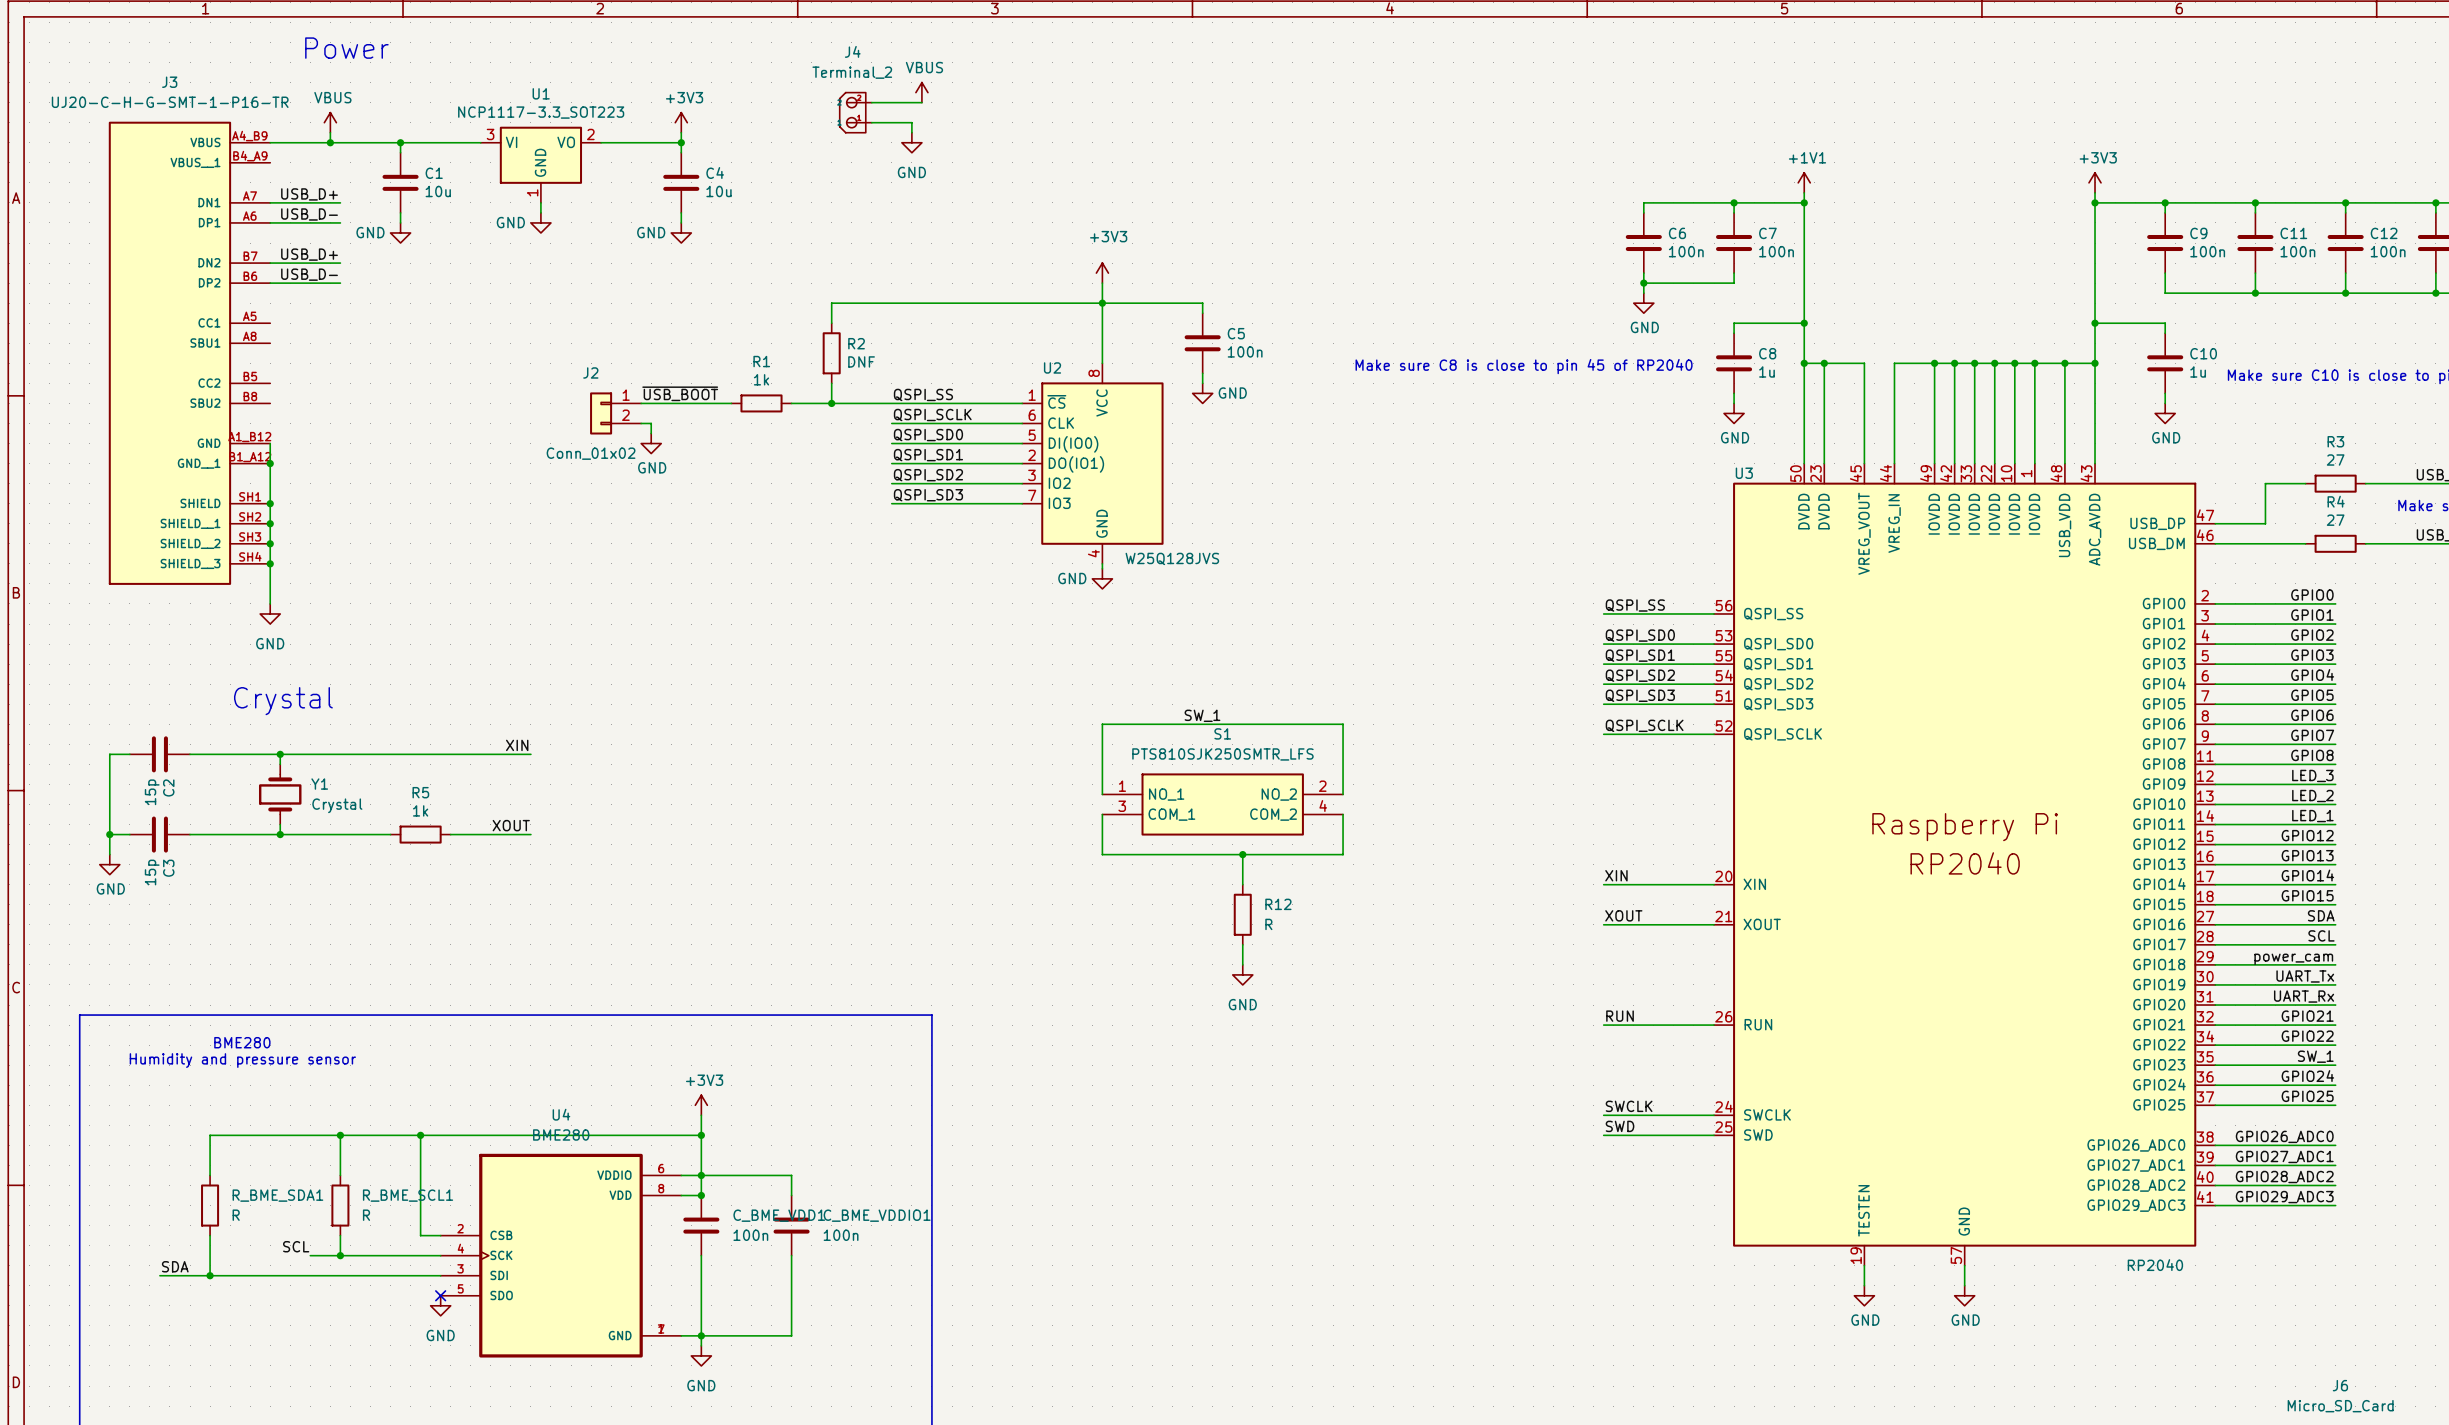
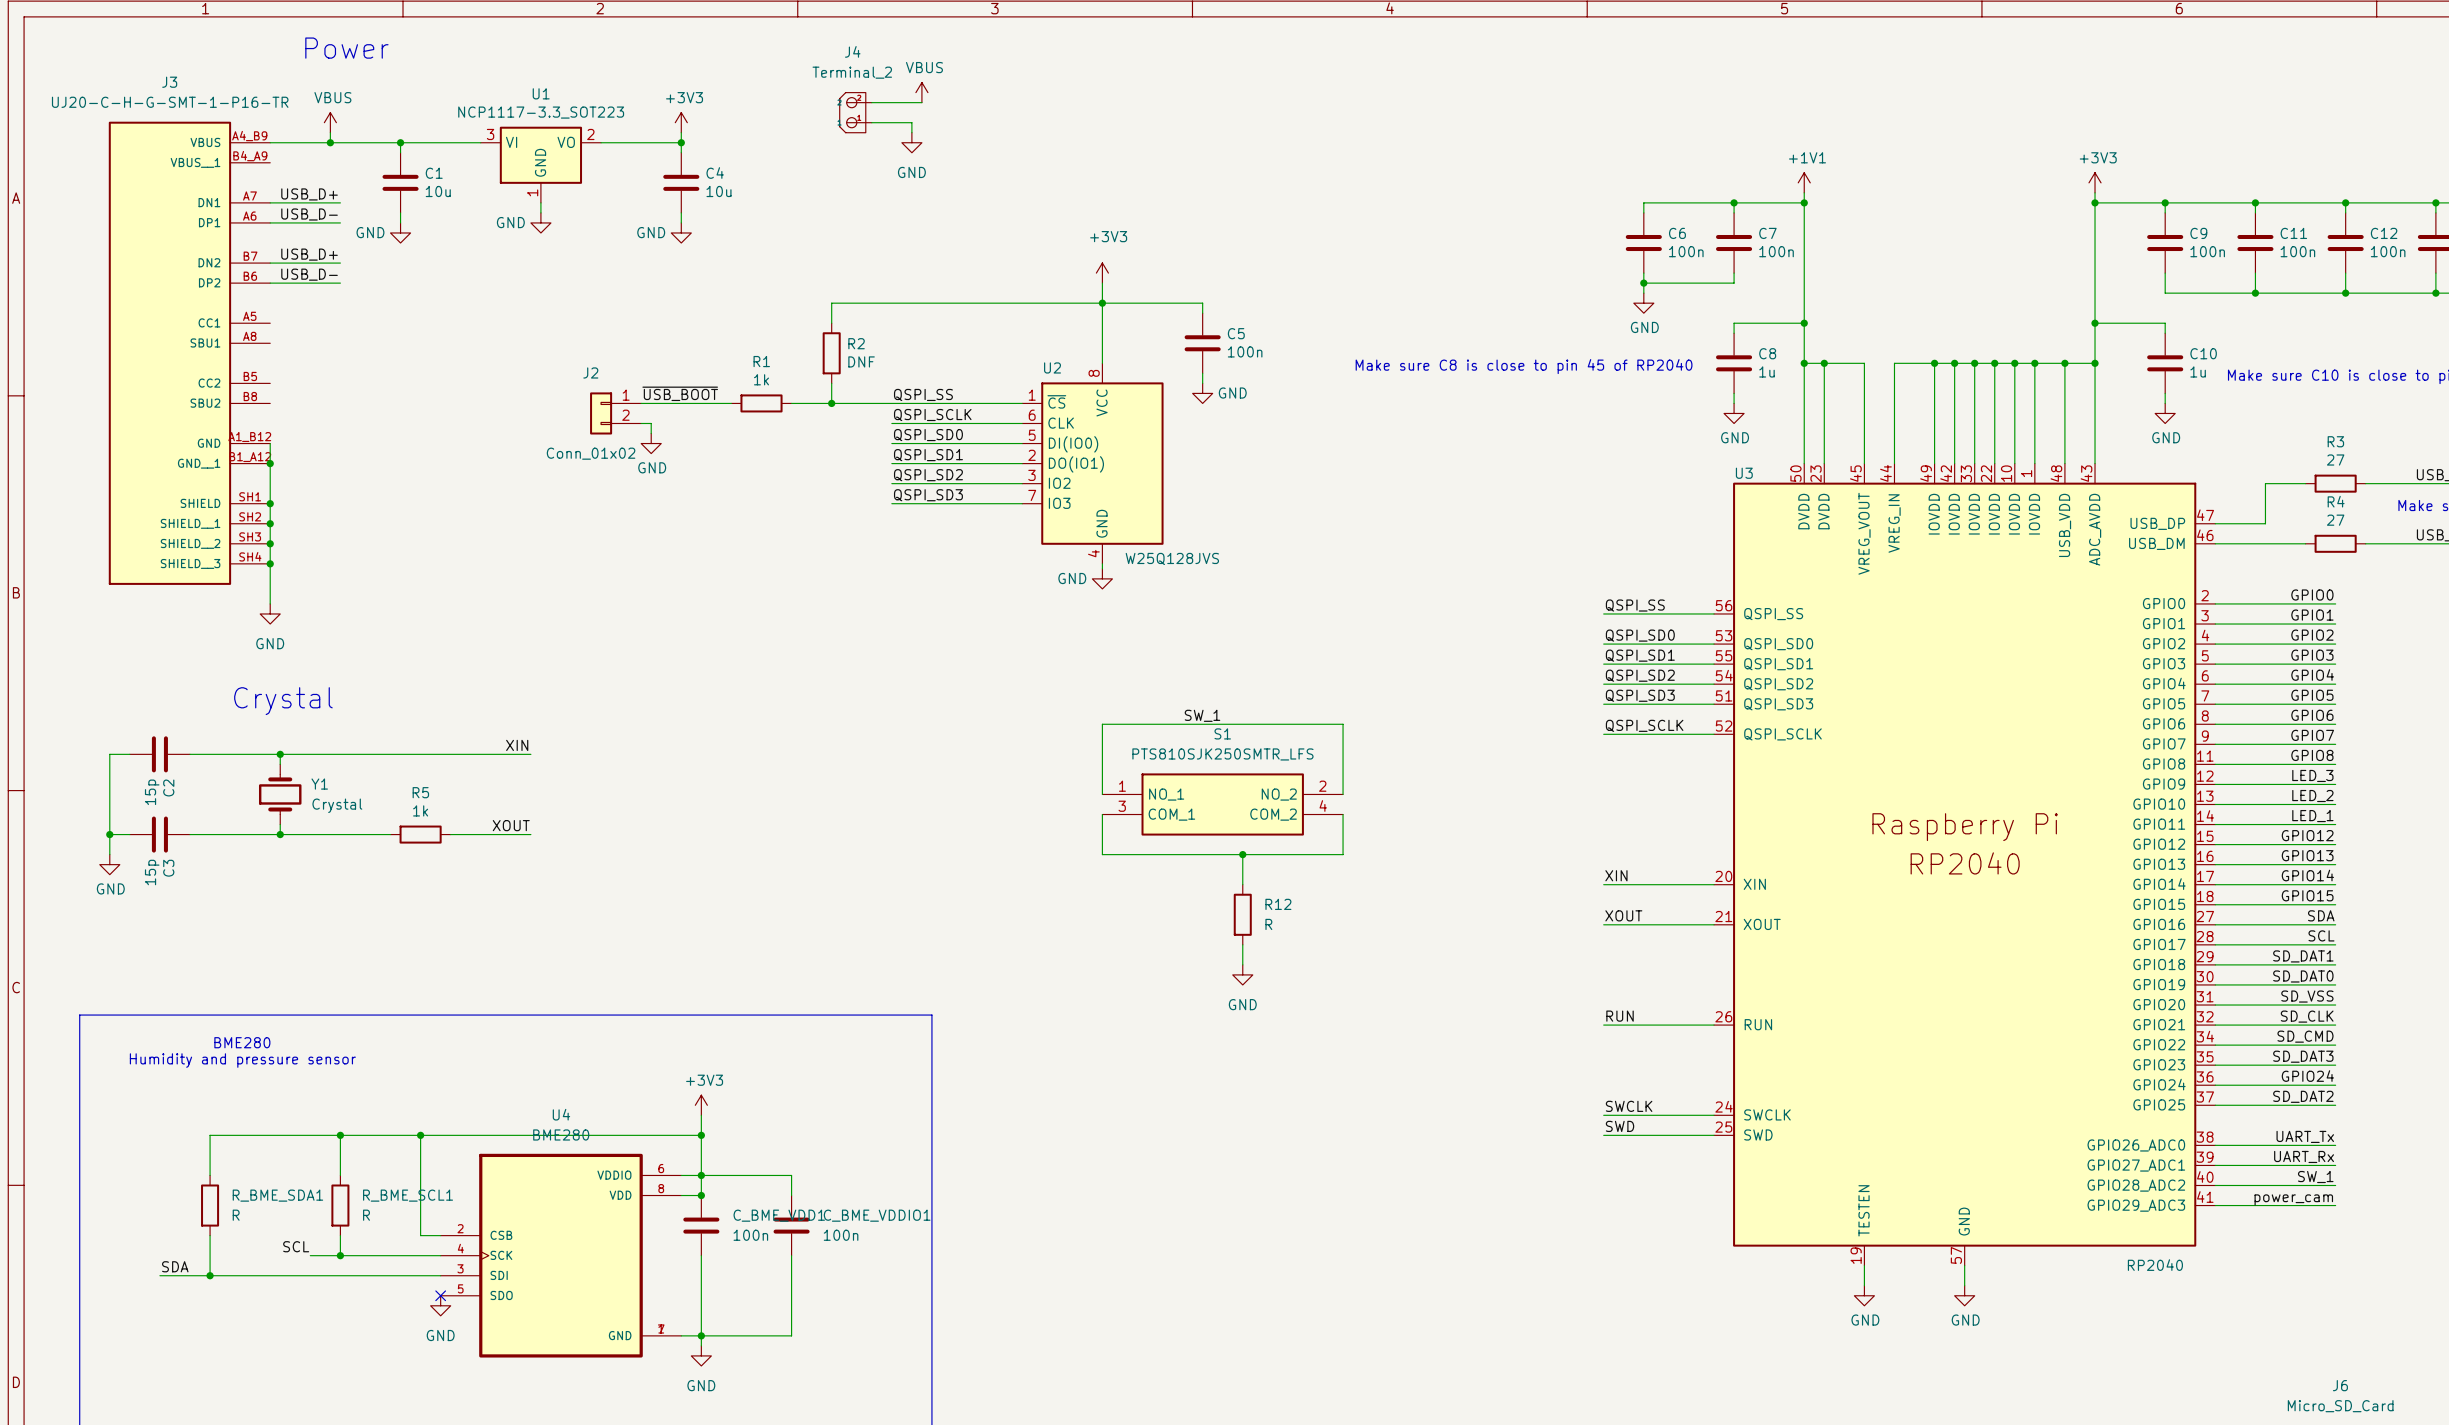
label: power_cam (2293, 959) -> SD_DAT1 (2303, 956)
label: UART_Tx (2305, 976) -> SD_DAT0 (2303, 976)
label: UART_Rx (2304, 996) -> SD_VSS (2307, 996)
label: GPIO21 (2307, 1016) -> SD_CLK (2307, 1016)
label: GPIO22 (2307, 1036) -> SD_CMD (2305, 1036)
label: SW_1 (2315, 1056) -> SD_DAT3 (2303, 1056)
label: GPIO25 (2307, 1096) -> SD_DAT2 (2303, 1096)
label: GPIO26_ADC0 (2284, 1136) -> UART_Tx (2305, 1136)
label: GPIO27_ADC1 (2284, 1156) -> UART_Rx (2304, 1156)
label: GPIO28_ADC2 (2284, 1177) -> SW_1 (2315, 1177)
label: GPIO29_ADC3 (2284, 1197) -> power_cam (2293, 1199)

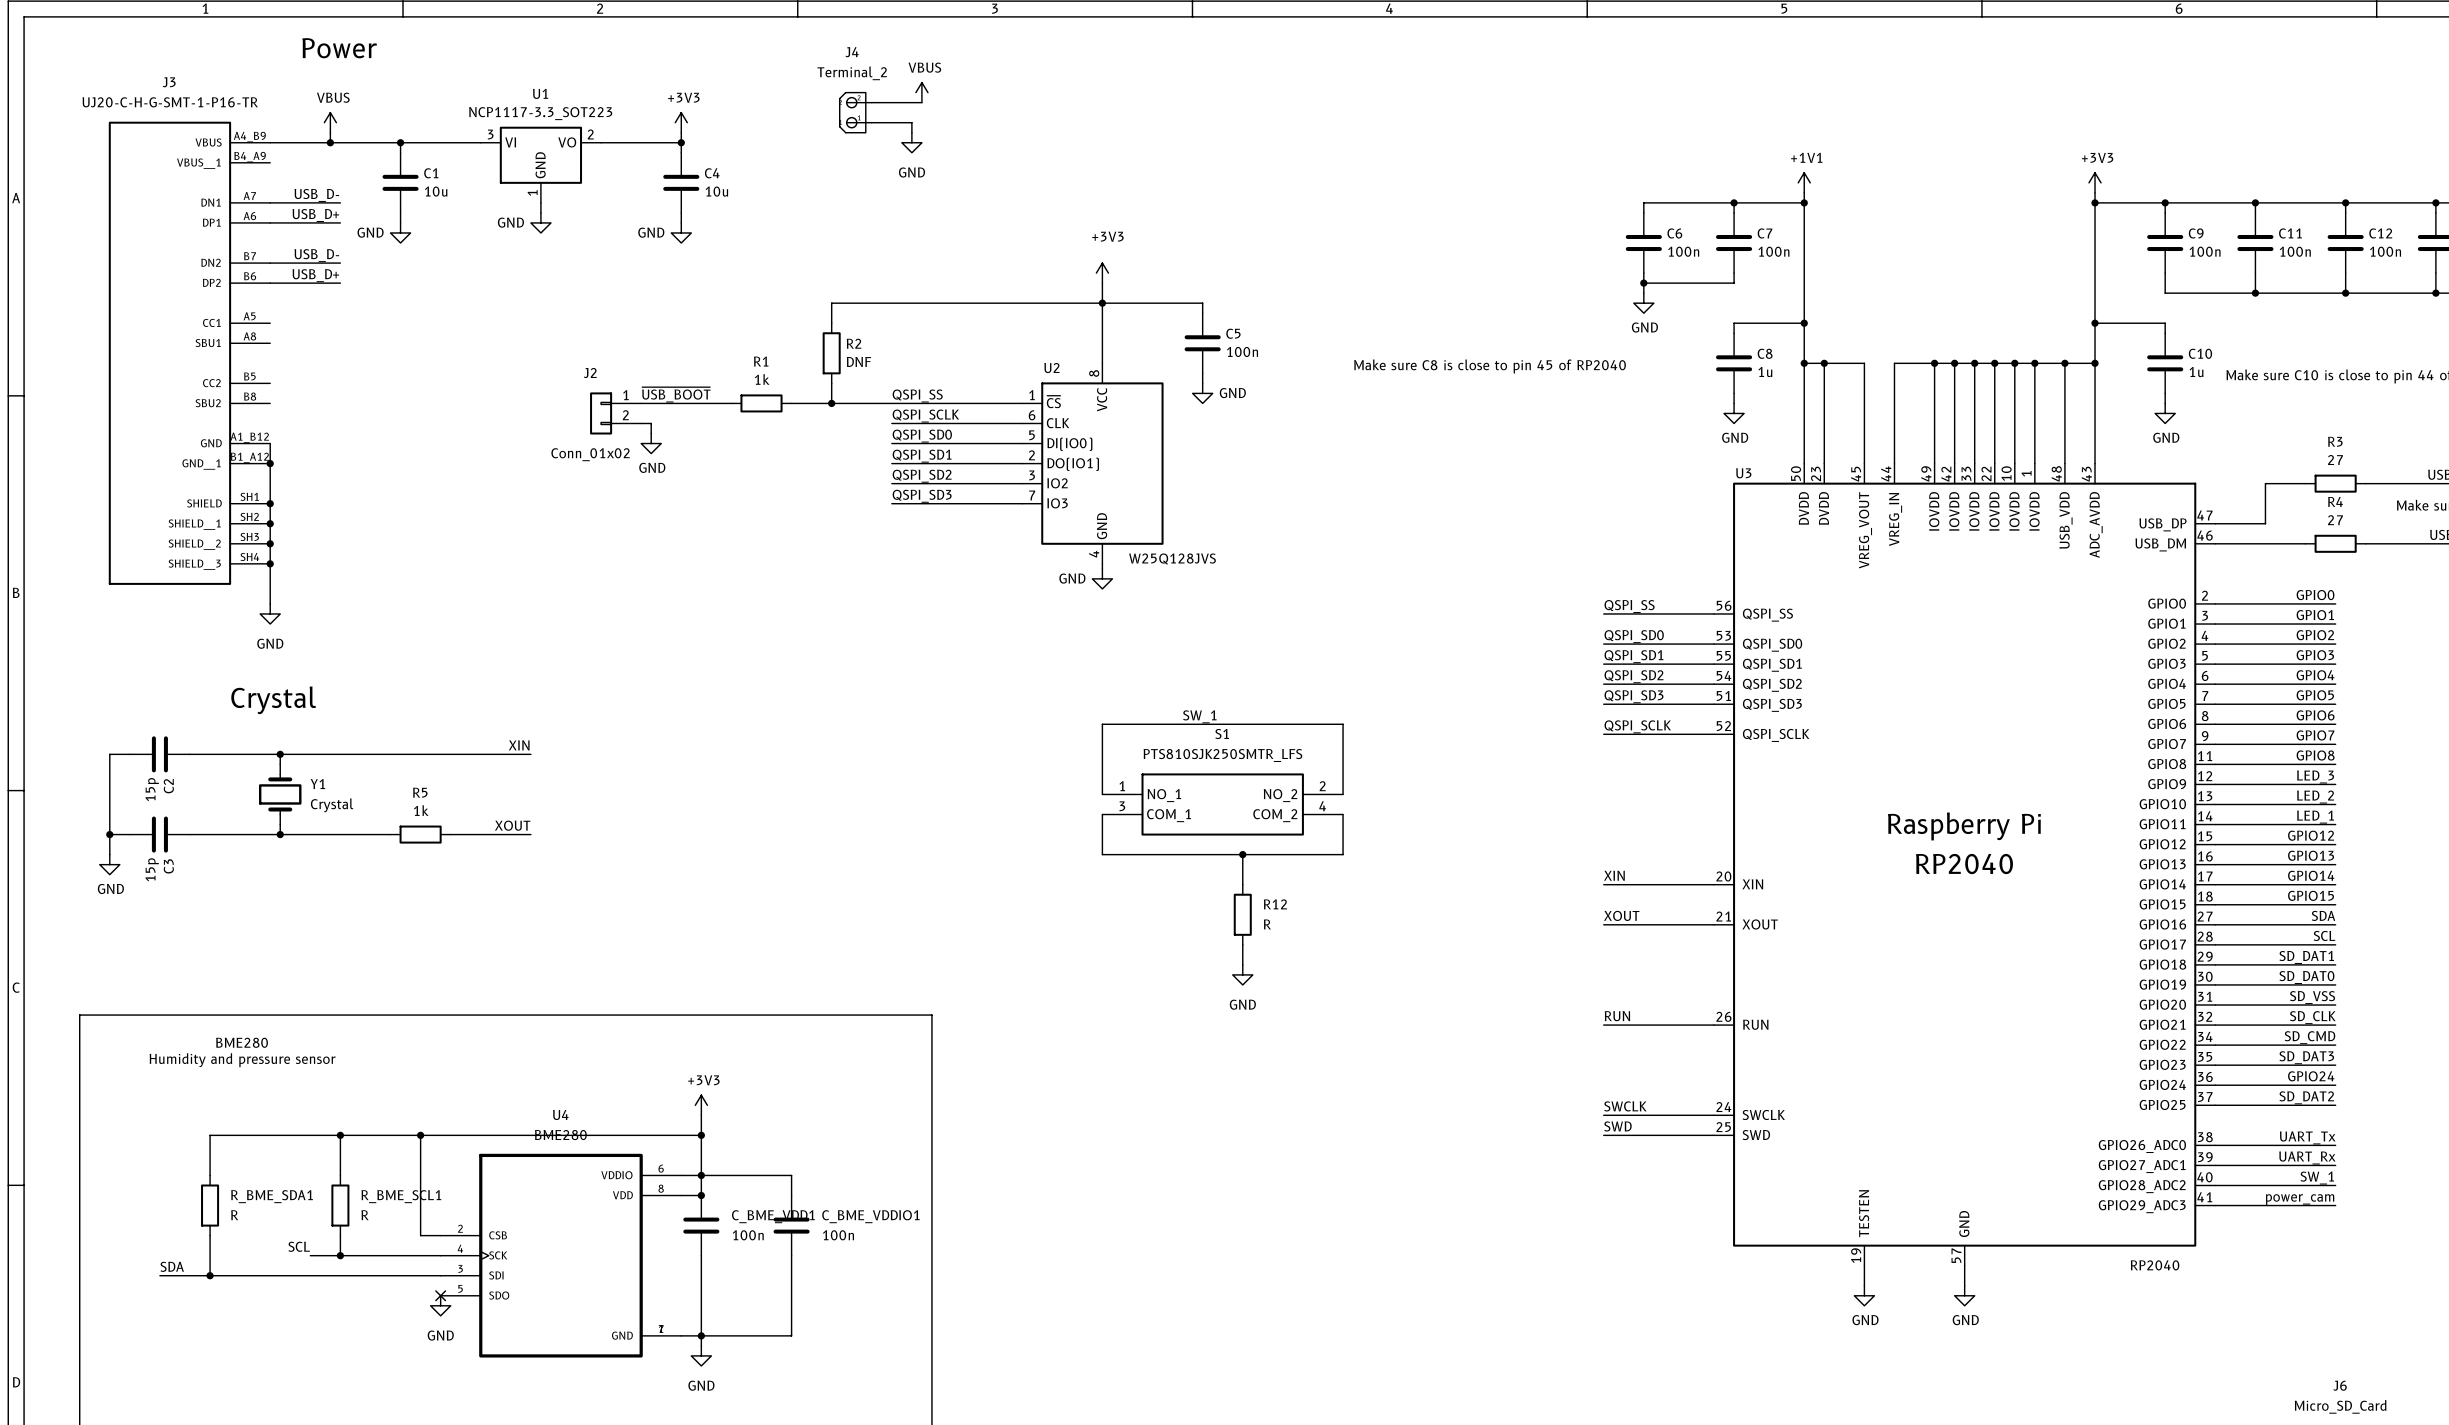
label: USB_D+ (309, 194) -> USB_D- (316, 195)
label: USB_D- (309, 214) -> USB_D+ (315, 215)
label: USB_D+ (309, 254) -> USB_D- (316, 255)
label: USB_D- (309, 274) -> USB_D+ (315, 275)

